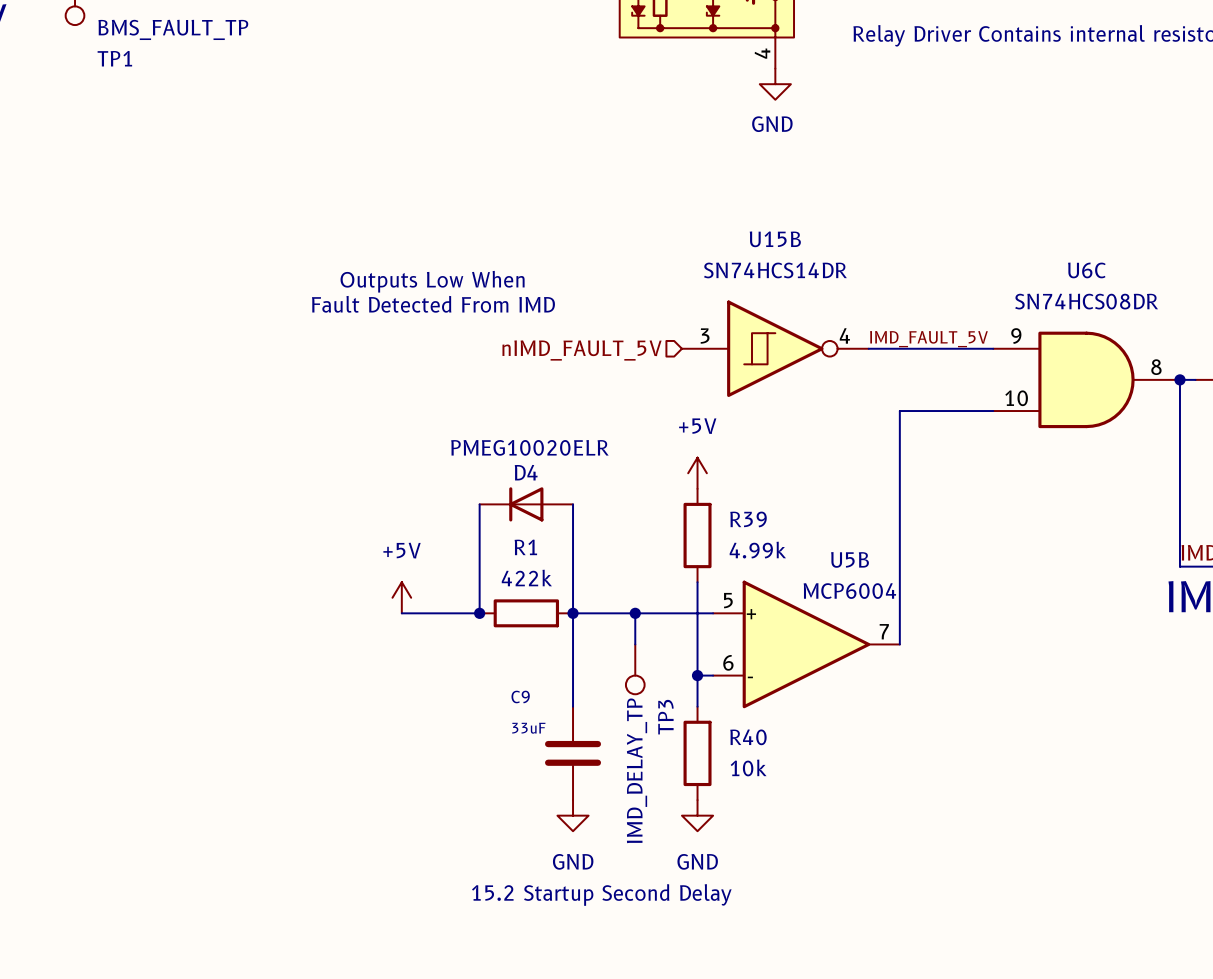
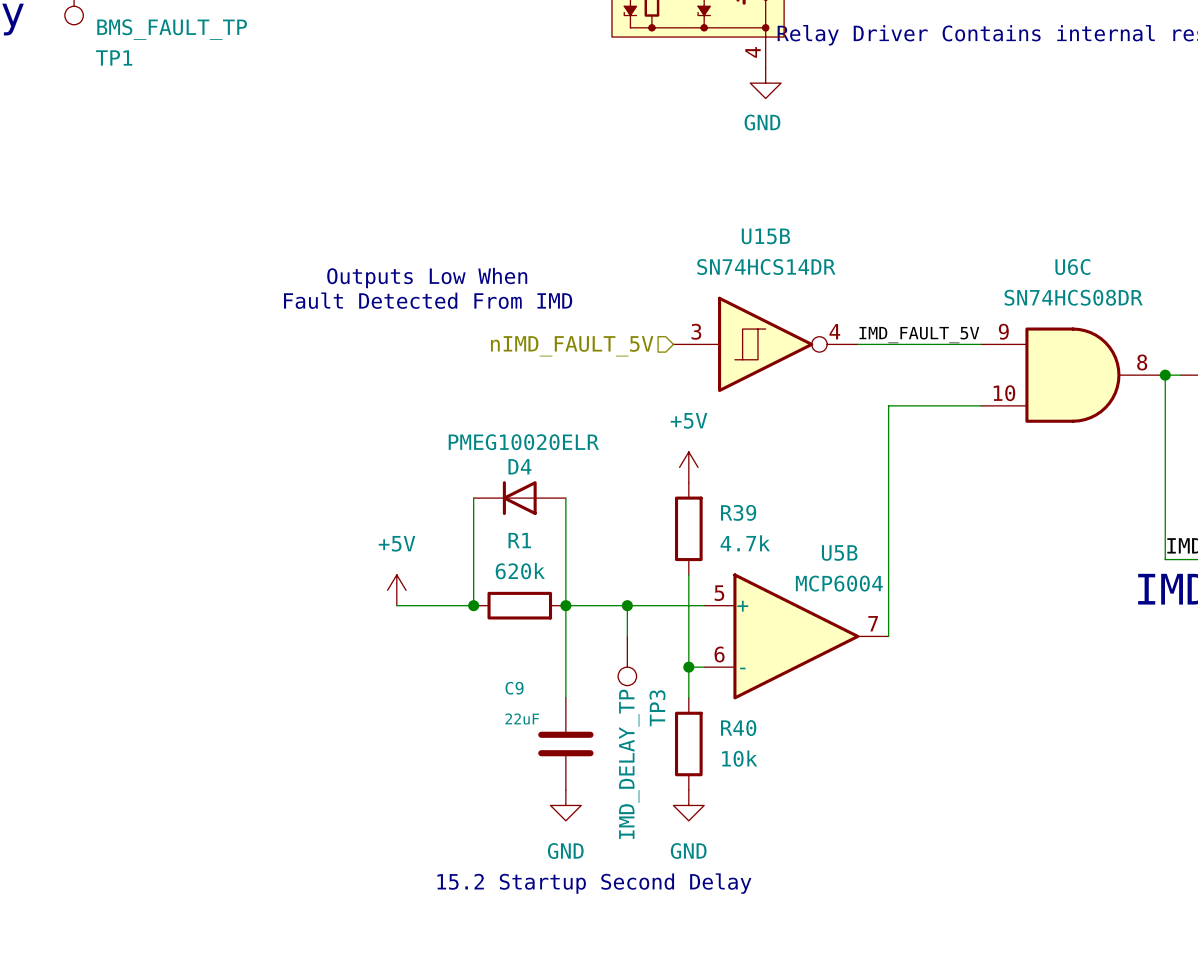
R39 value: 4.99k (757, 550) -> 4.7k (745, 543)
R1 value: 422k (526, 578) -> 620k (520, 571)
C9 value: 33uF (528, 728) -> 22uF (522, 719)

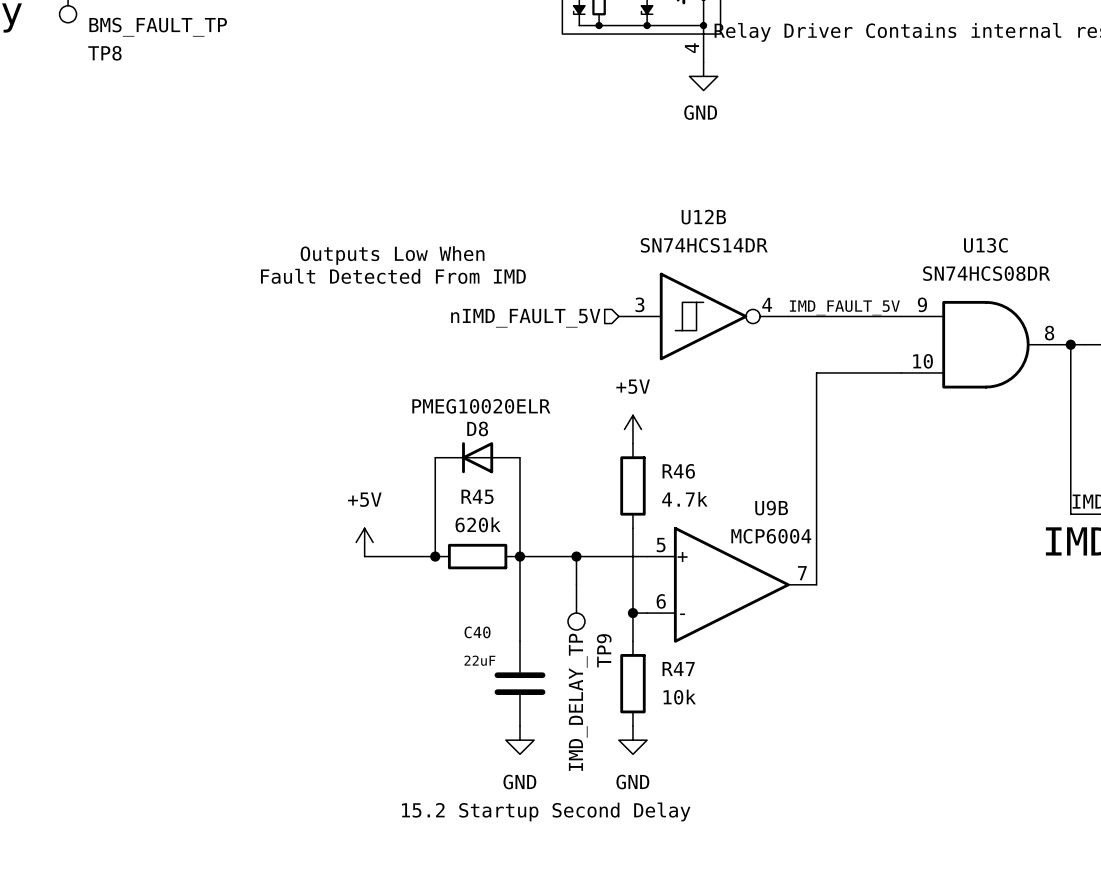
TP1 name: TP1 (114, 57) -> TP8 (104, 53)
U15B name: U15B (765, 236) -> U12B (703, 217)
U6C name: U6C (1072, 267) -> U13C (985, 245)
D4 name: D4 (519, 466) -> D8 (477, 428)
R39 name: R39 (738, 512) -> R46 (678, 471)
R1 name: R1 (519, 540) -> R45 (477, 496)
U5B name: U5B (839, 553) -> U9B (771, 508)
C9 name: C9 (514, 688) -> C40 (477, 632)
TP3 name: TP3 (657, 708) -> TP9 (604, 650)
R40 name: R40 (738, 728) -> R47 (678, 669)

